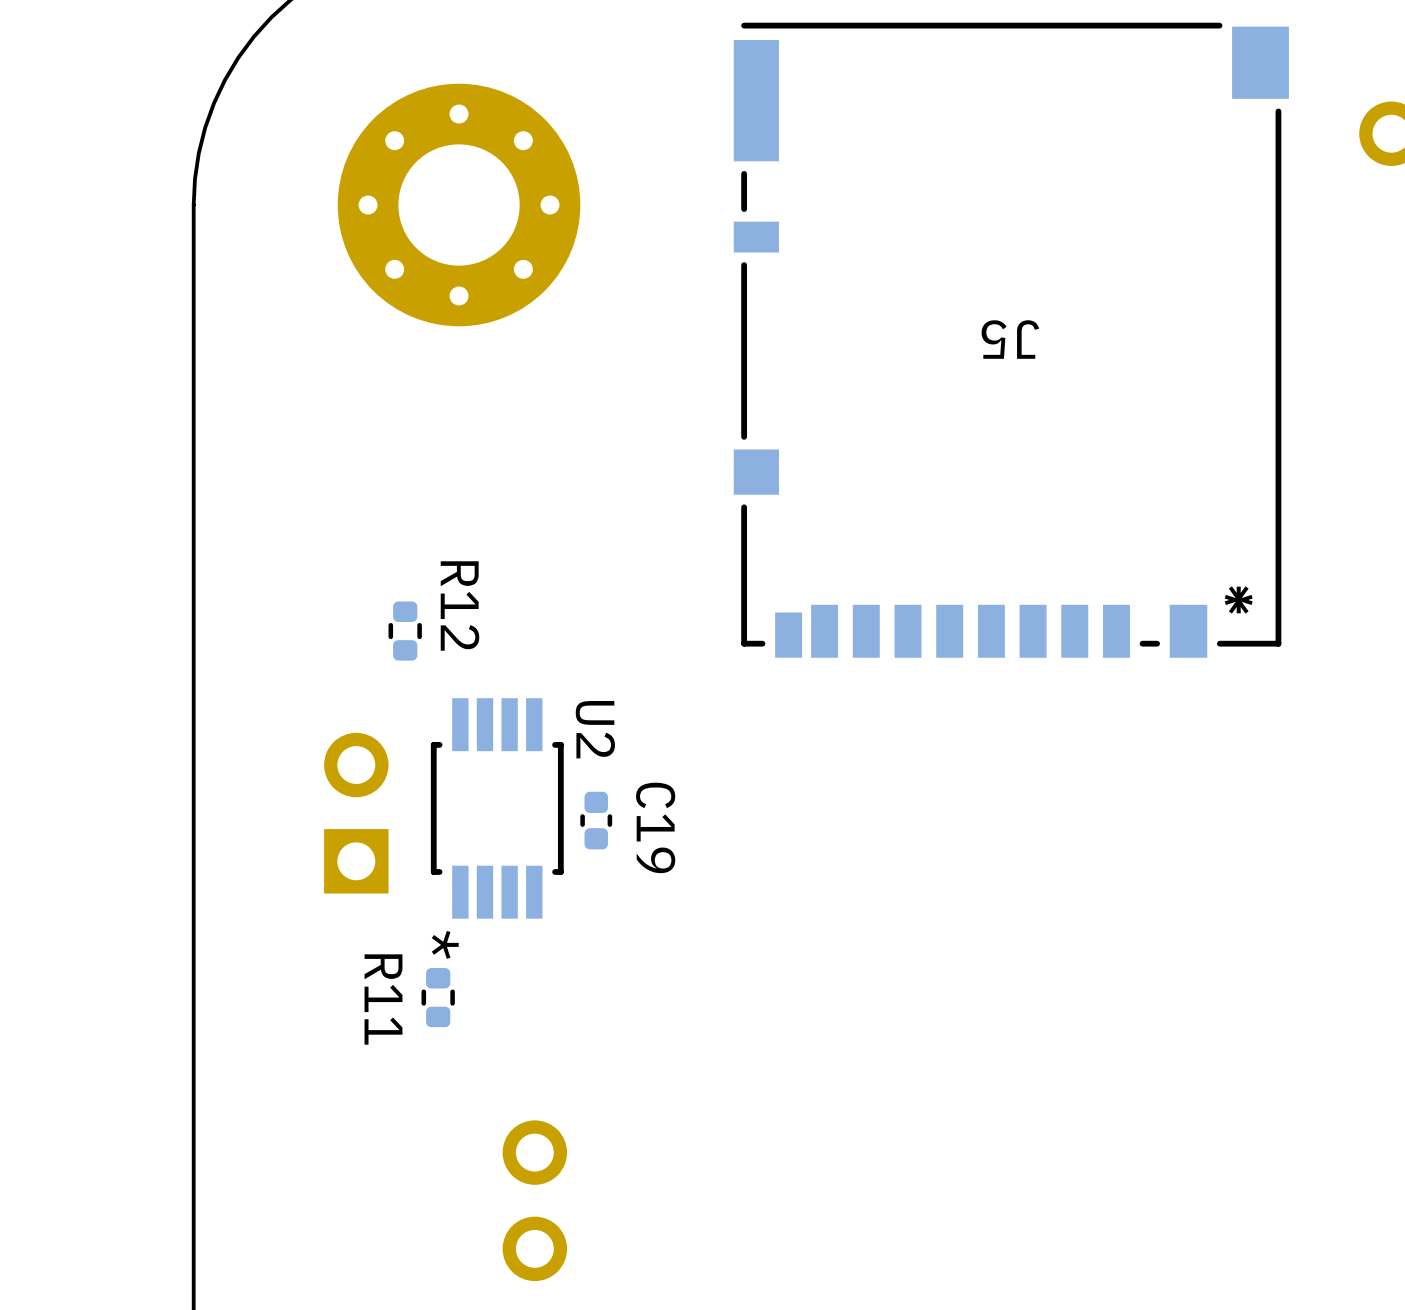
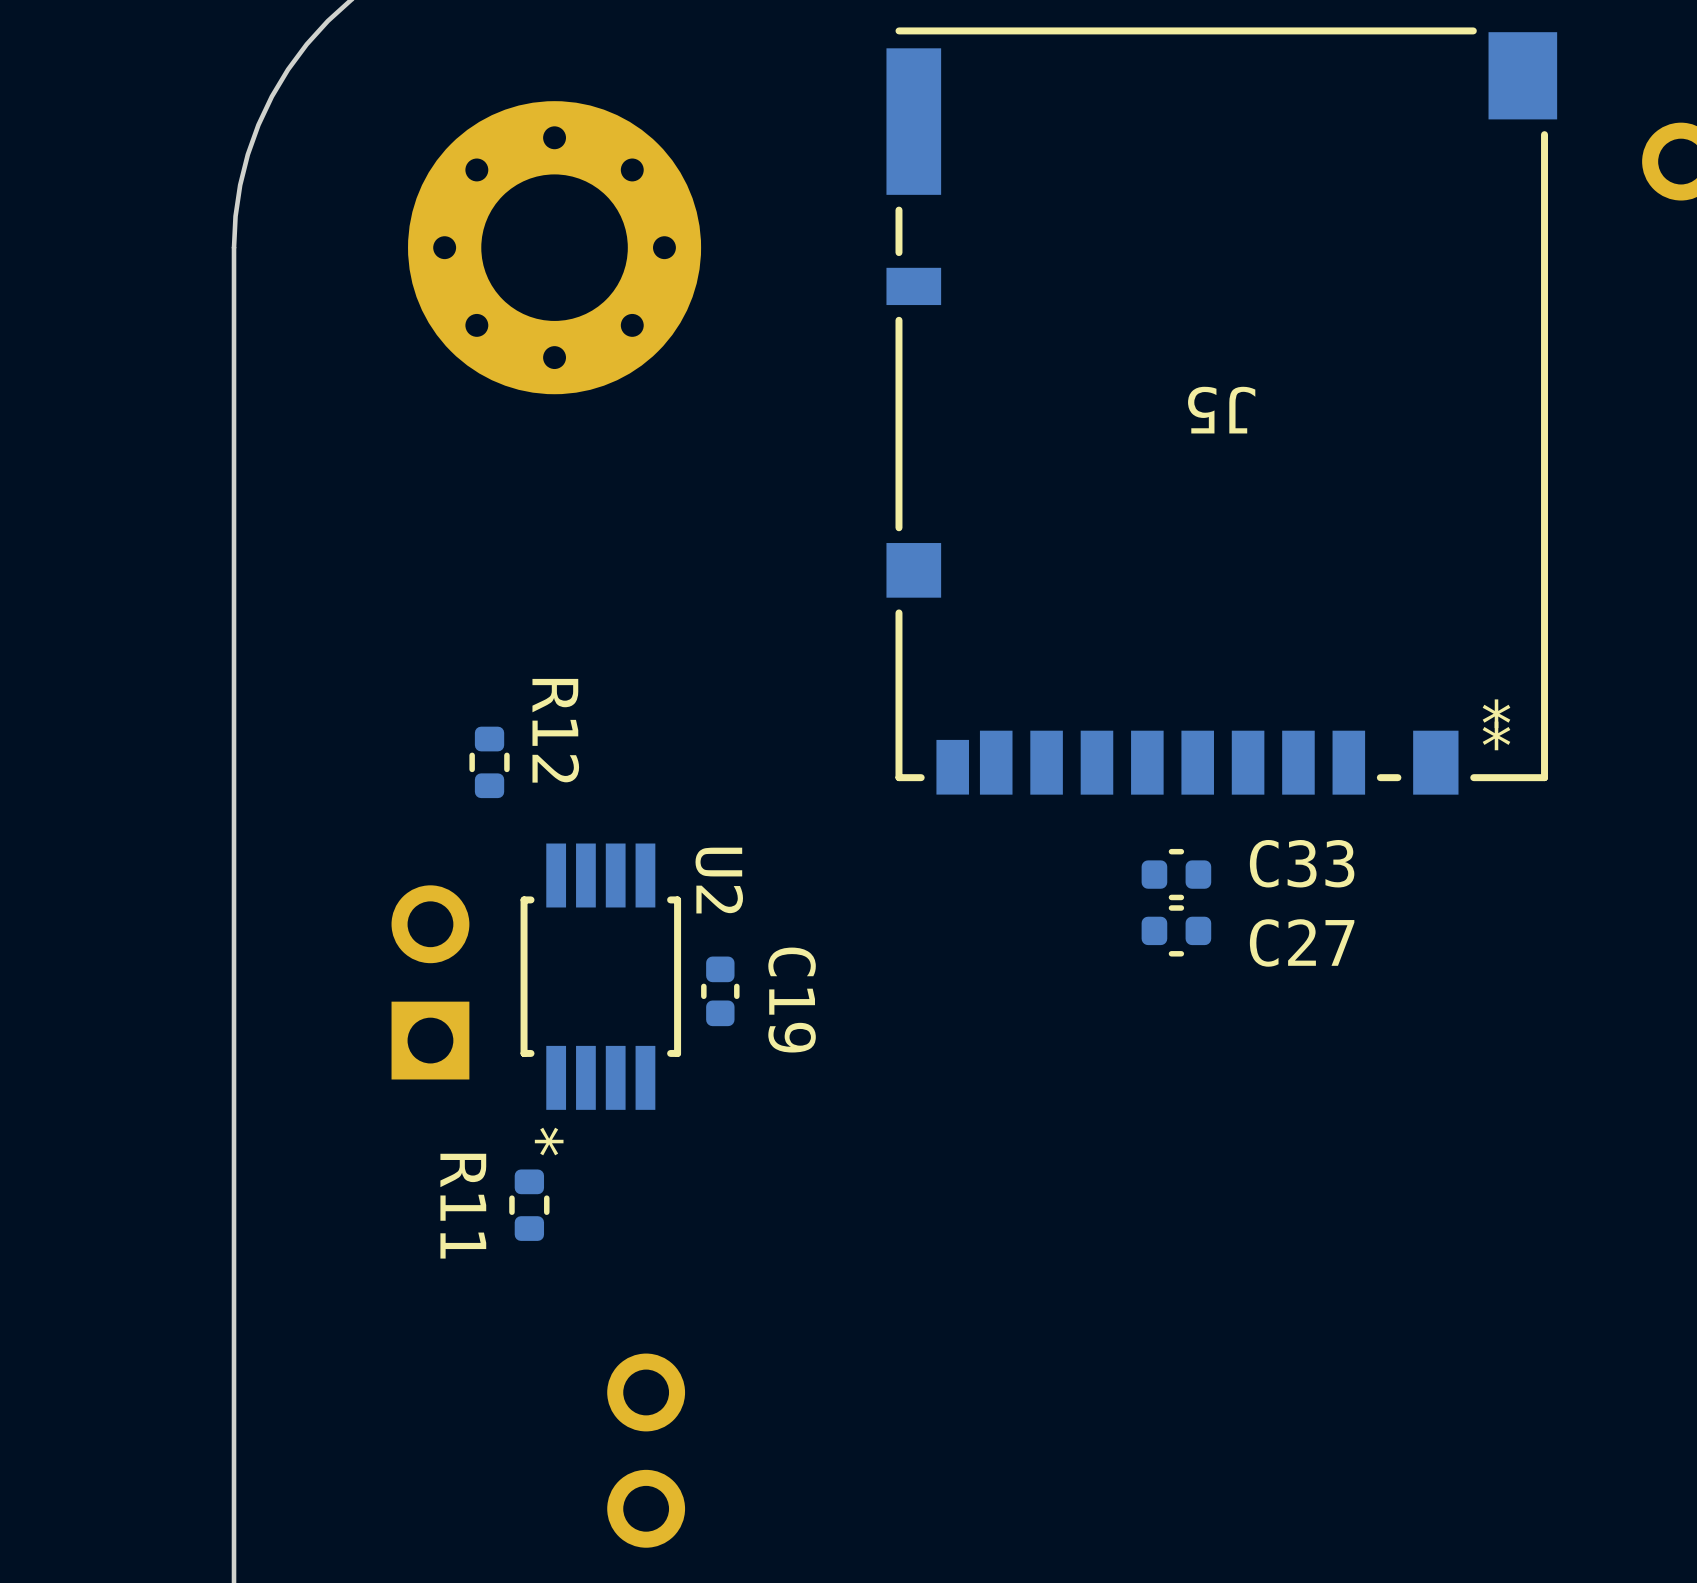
C33: none -> (1176, 874)
C27: none -> (1176, 930)

